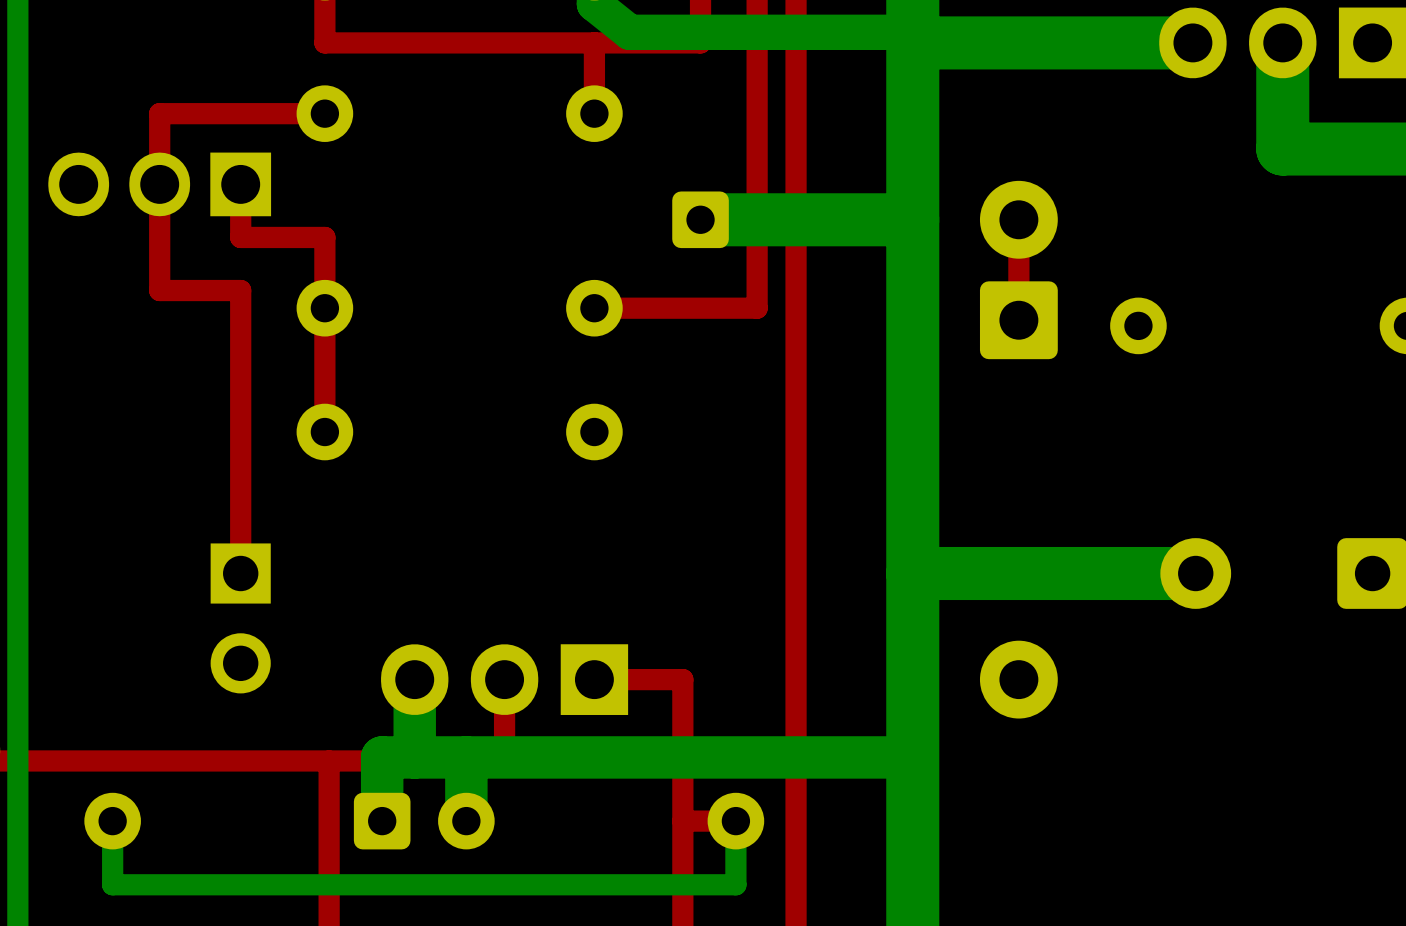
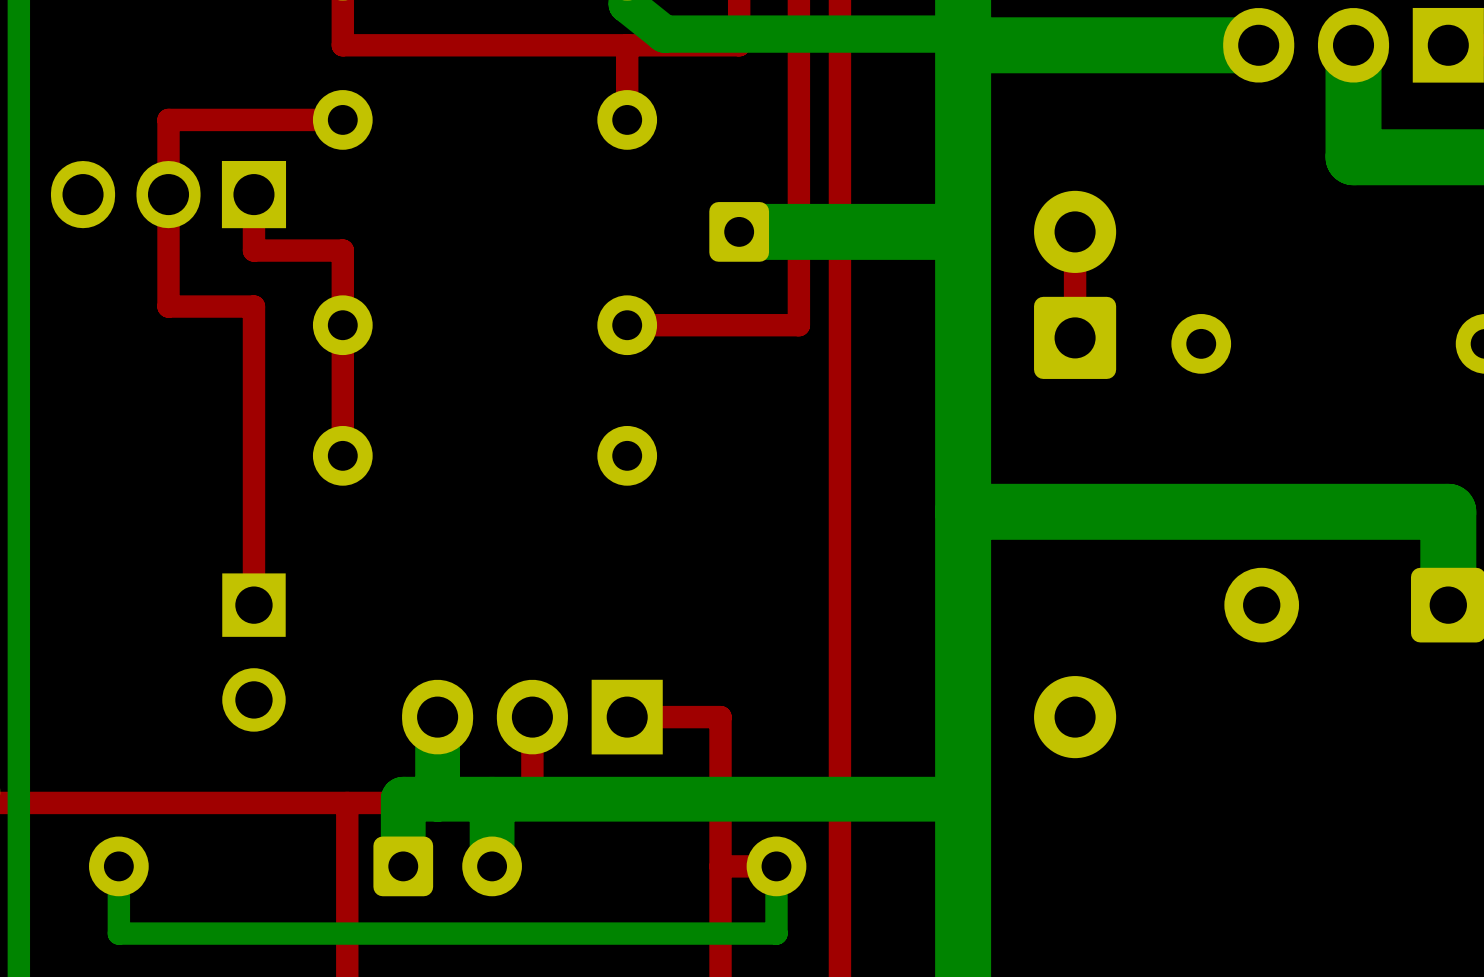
bottom track: none -> (963, 511) (1448, 511) (1448, 605)
bottom track: (1195, 573) (912, 573) -> none

